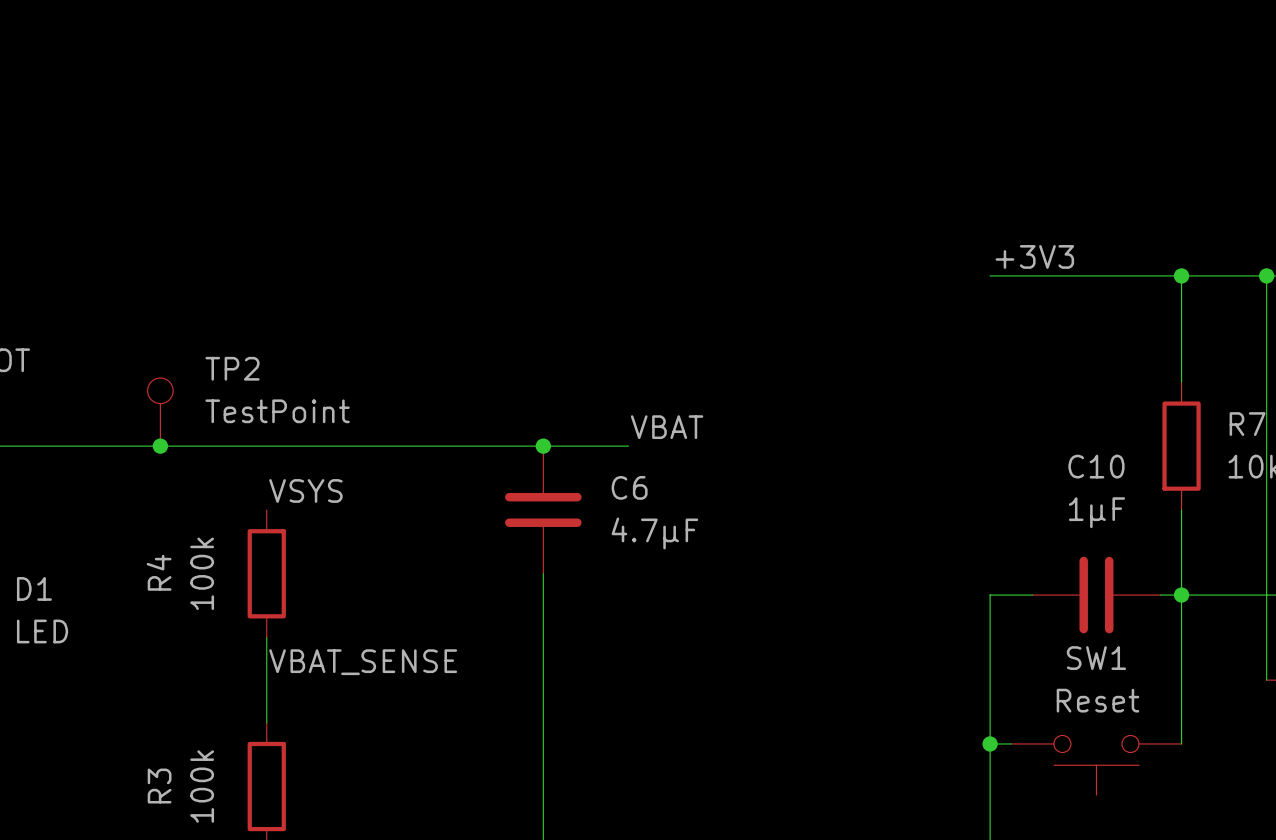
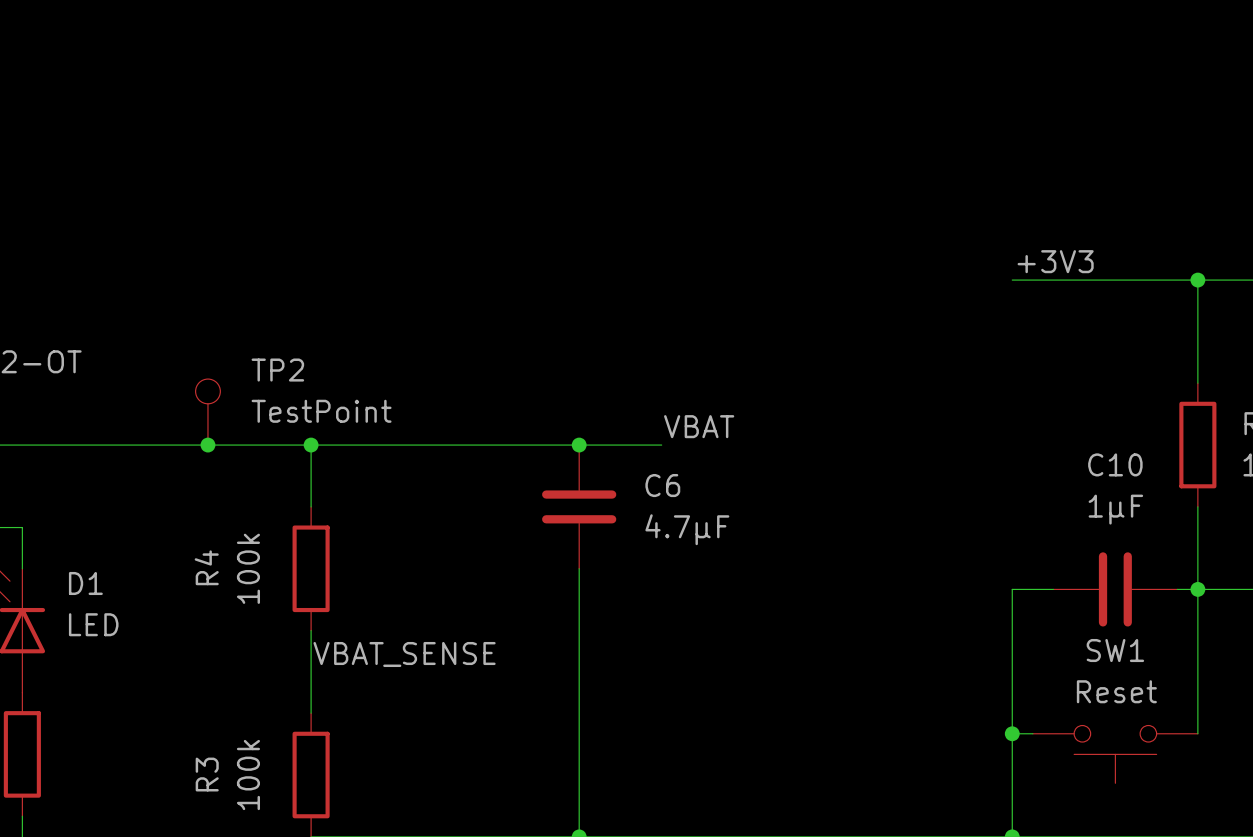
wire: none -> (311, 445) (311, 506)
junction: none -> (311, 445)
label: VSYS (305, 490) -> none

